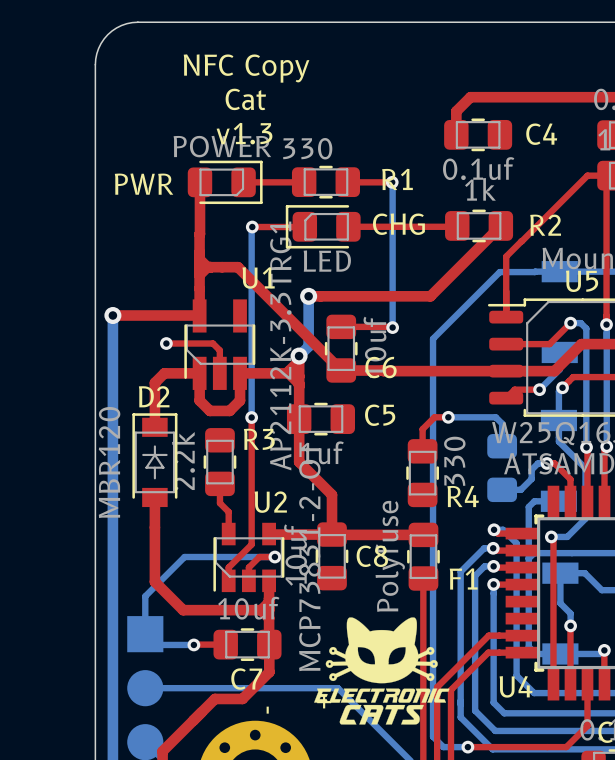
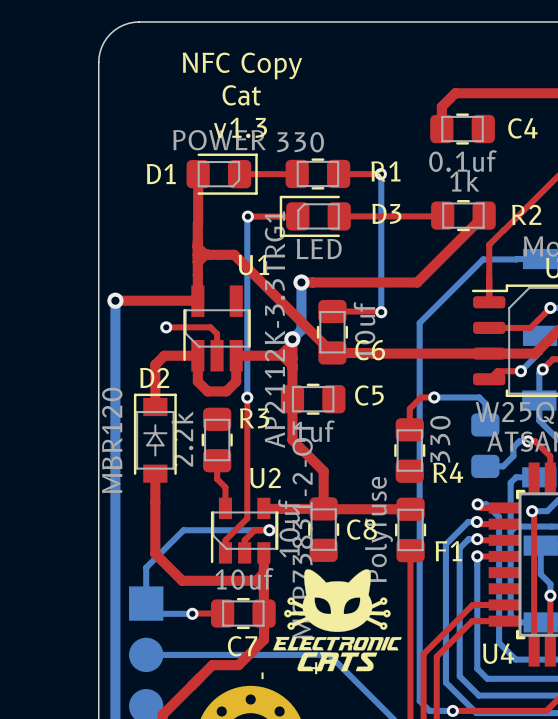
PWR name: PWR (144, 184) -> D1 (161, 174)
CHG name: CHG (398, 224) -> D3 (386, 213)
drawing position: (381, 670) -> (337, 620)

